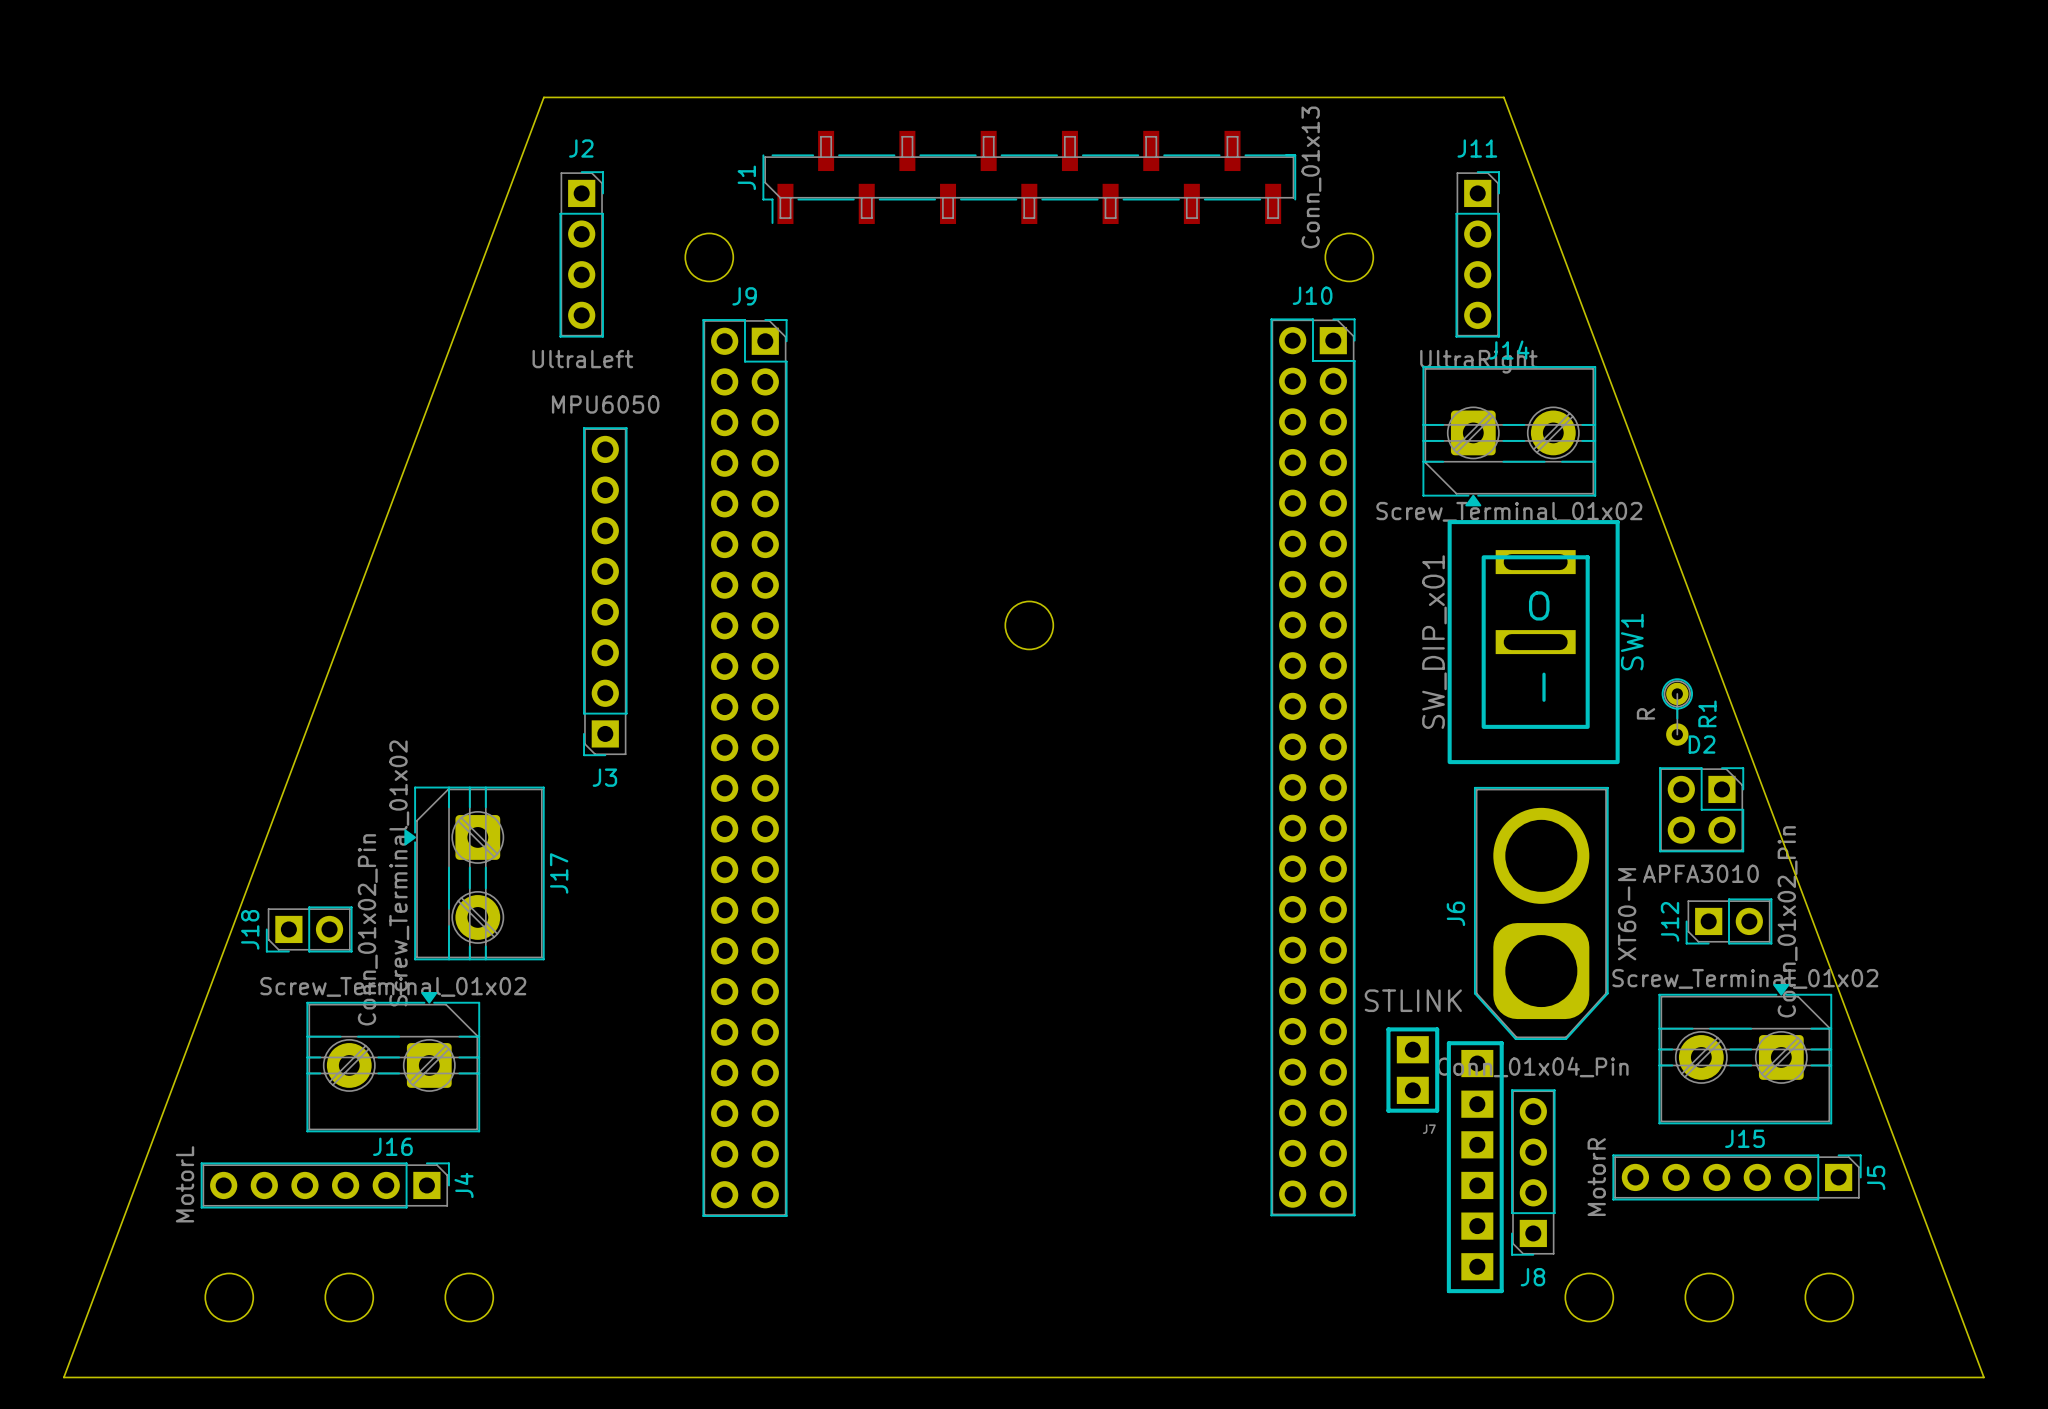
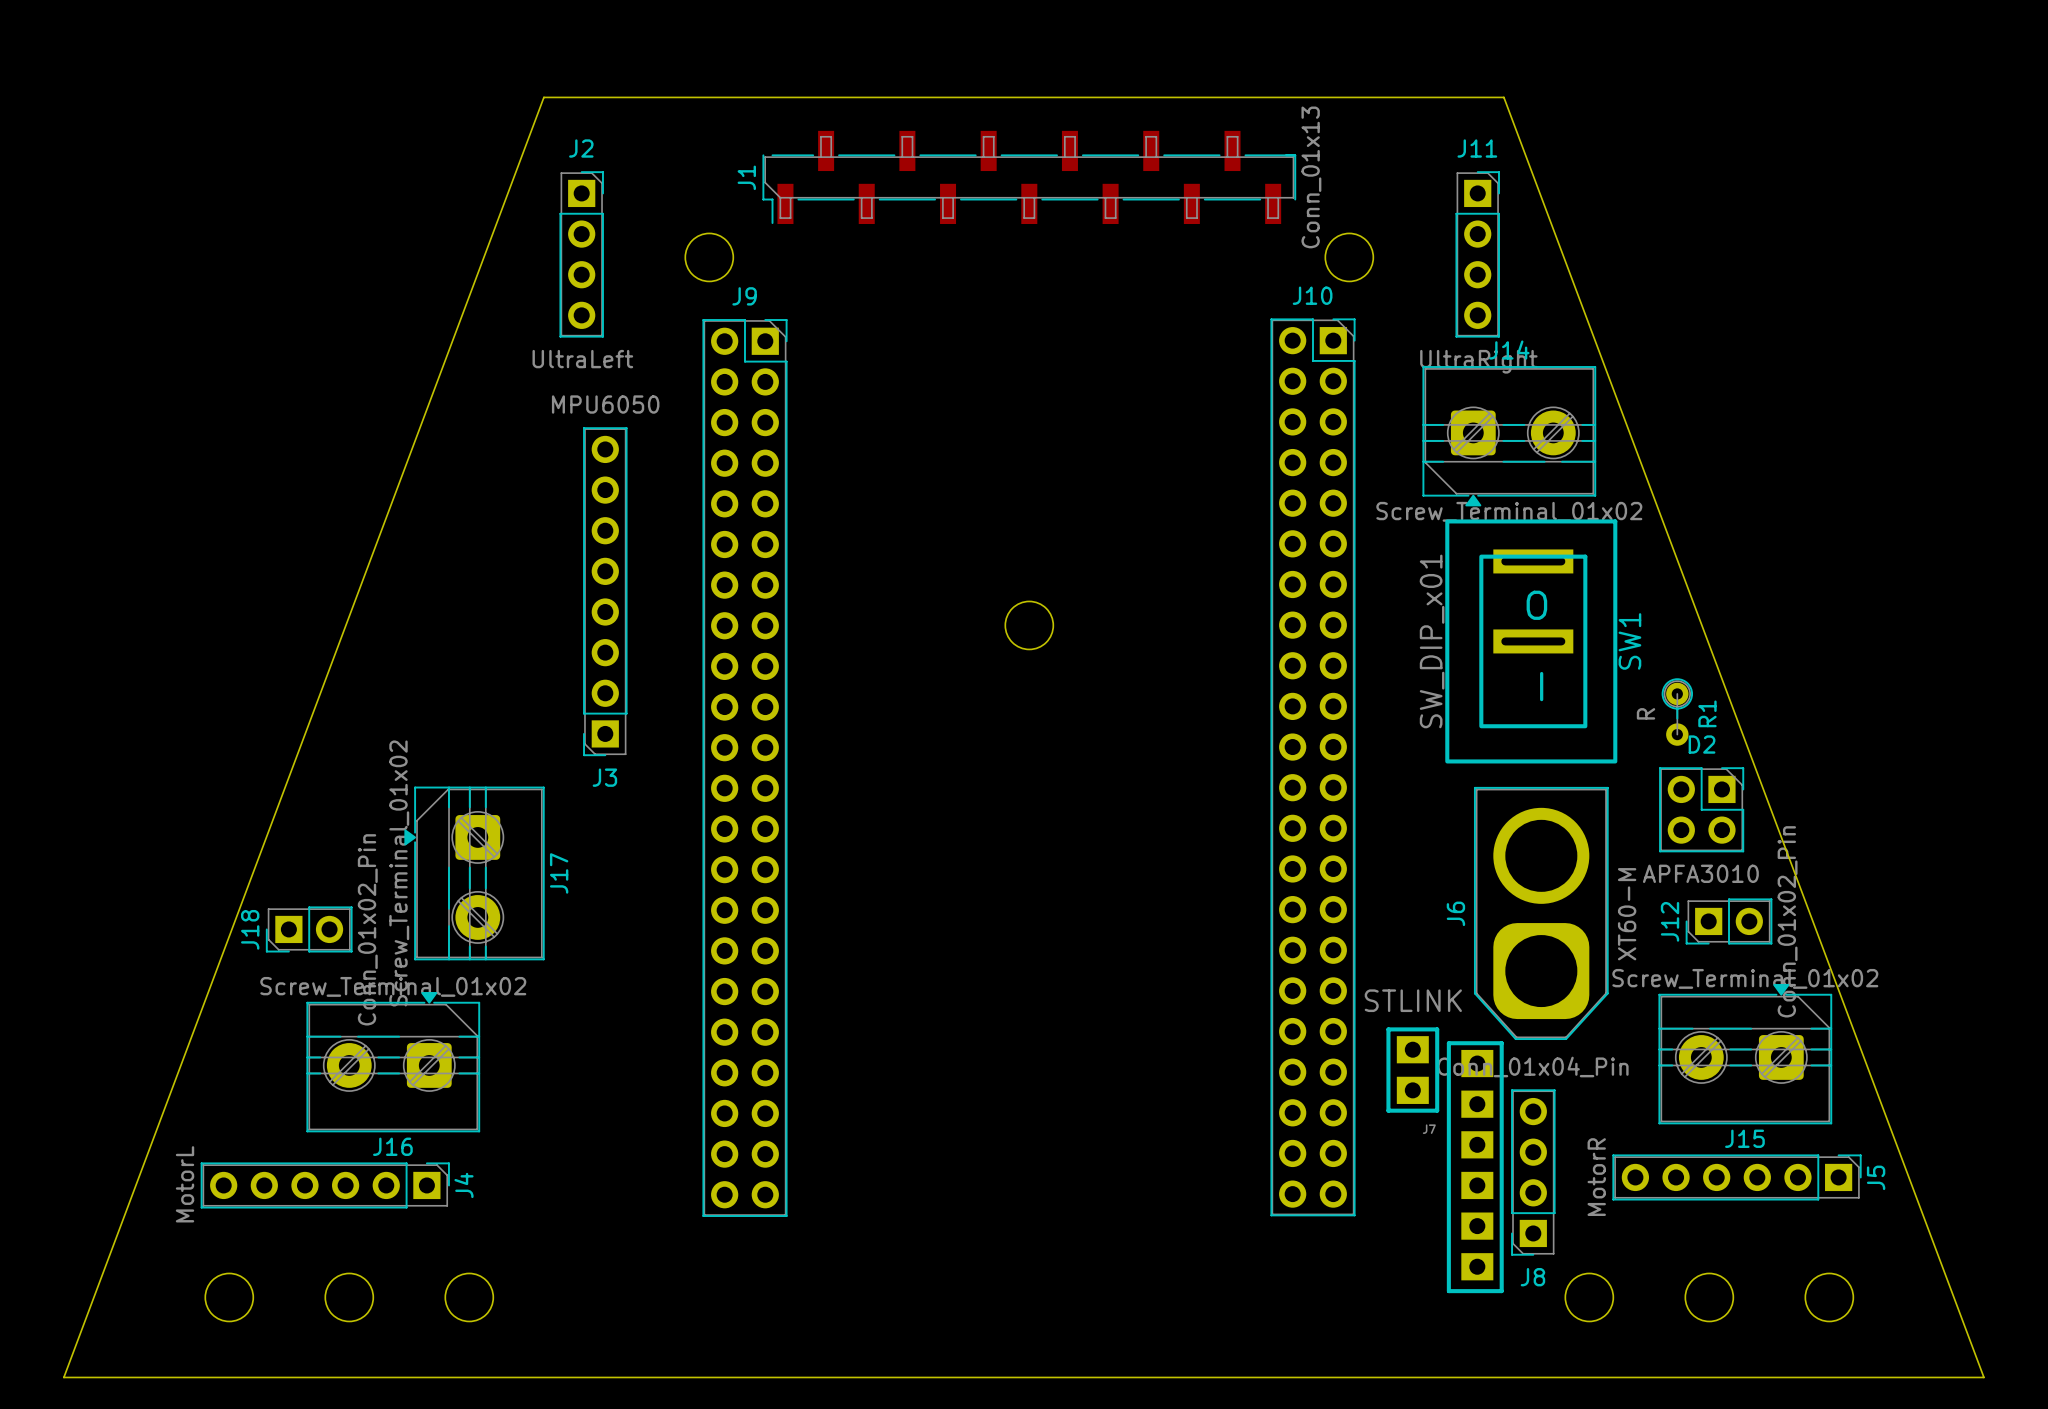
SW1 footprint: [1447, 520, 1620, 765] -> [1445, 519, 1618, 764]

